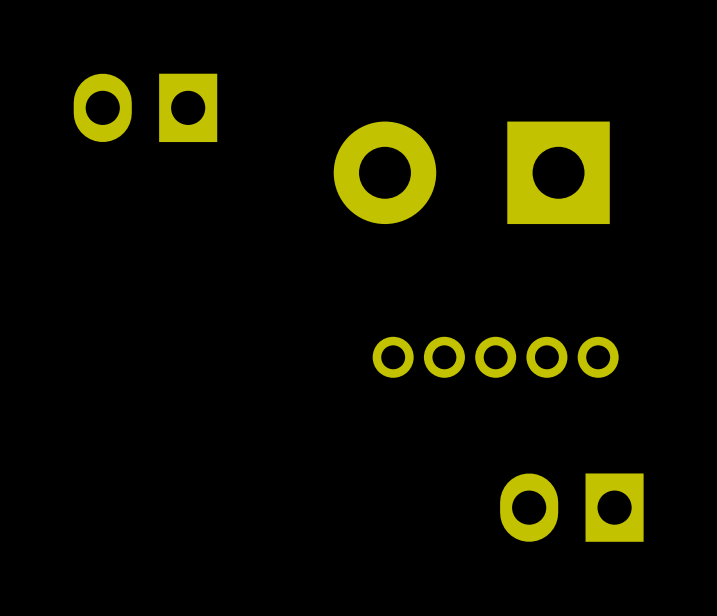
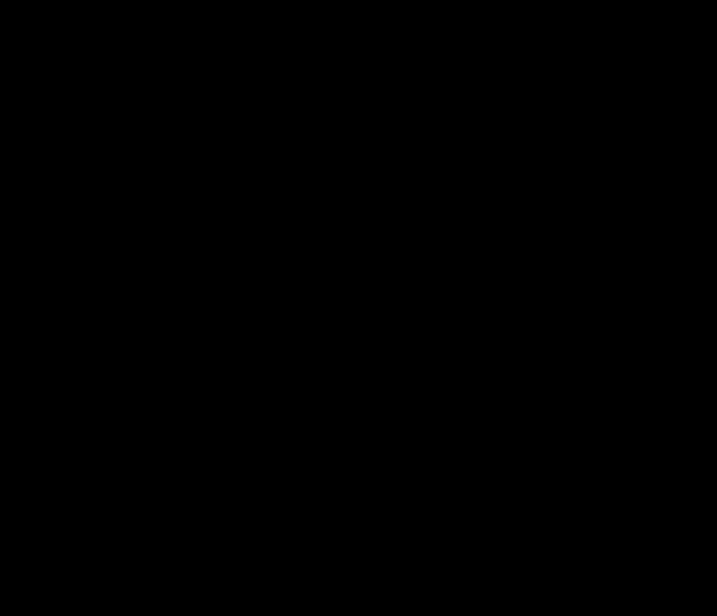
part: (145, 107) -> none
part: (471, 172) -> none
part: (495, 357) -> none
part: (571, 507) -> none

